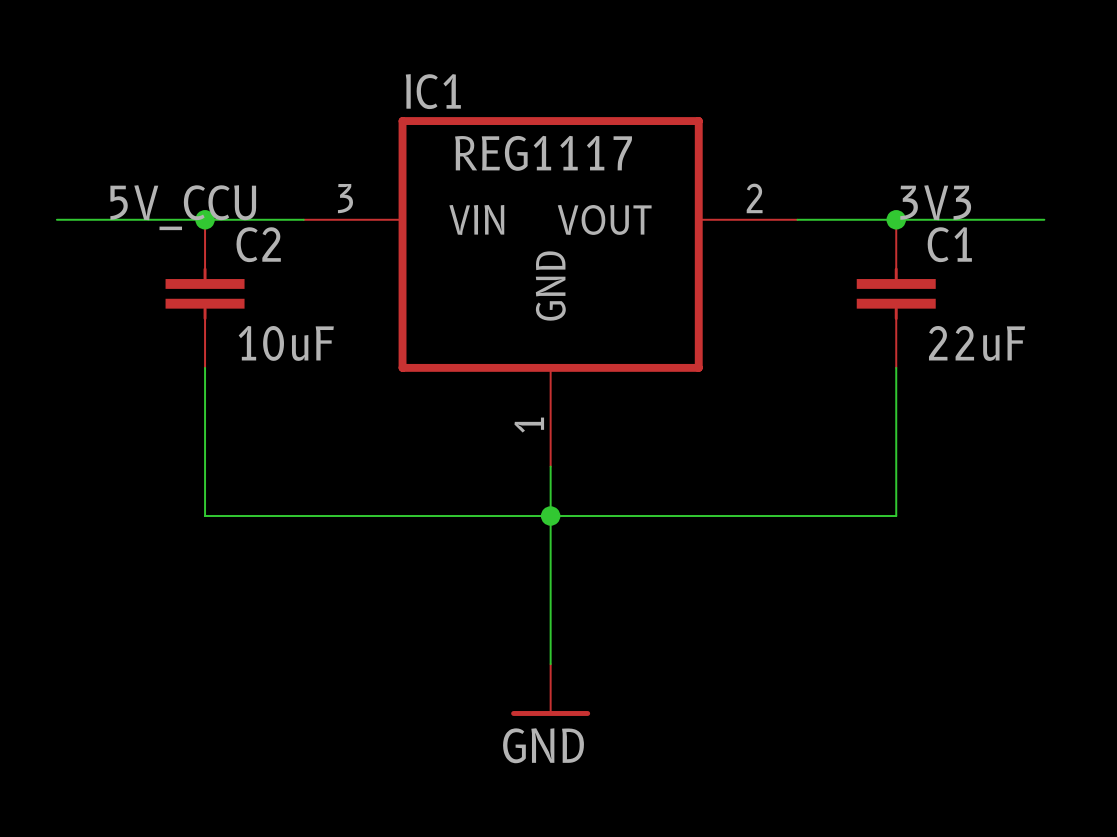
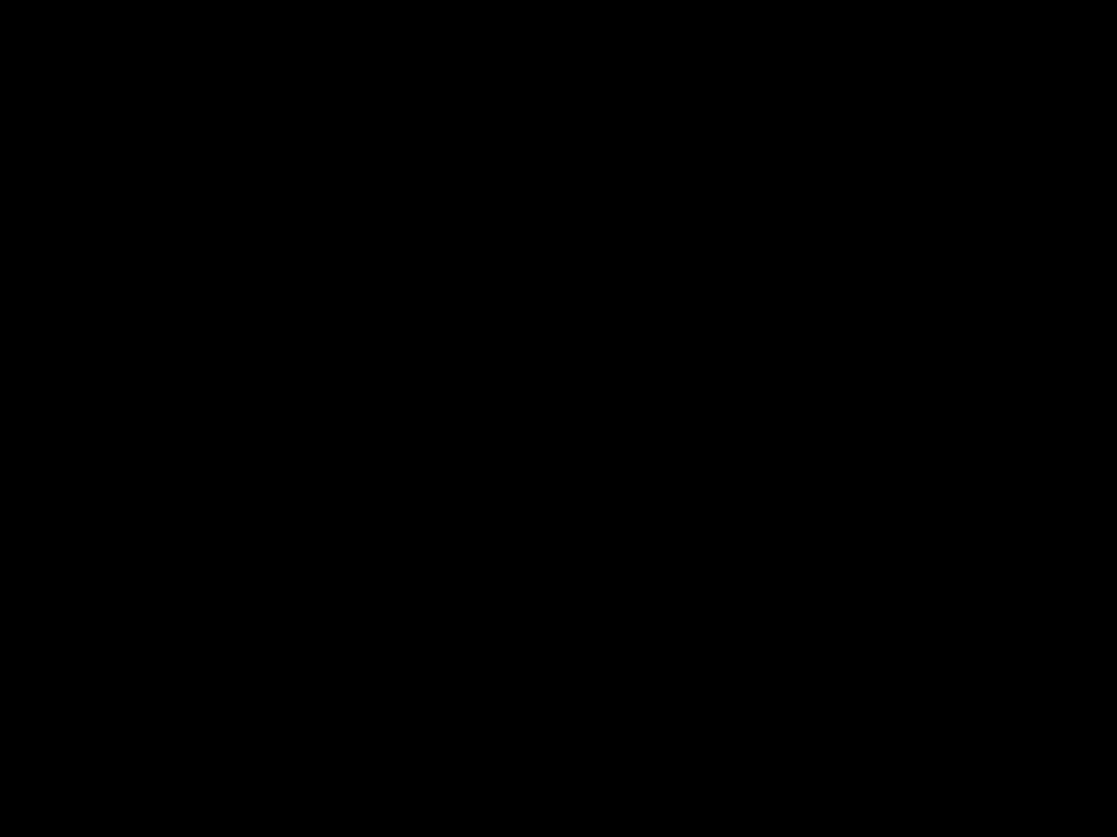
label: 3V3 (935, 202) -> none
label: 5V_CCU (183, 207) -> none
wire: (56, 219) (303, 219) -> none
junction: (205, 219) -> none
wire: (797, 219) (1044, 219) -> none
junction: (896, 219) -> none
IC1: REG1117 (550, 291) -> none
C2: 10uF (205, 293) -> none
C1: 22uF (896, 293) -> none
wire: (205, 367) (205, 516) (896, 516) (896, 367) -> none
wire: (550, 466) (550, 664) -> none
junction: (550, 516) -> none
power symbol: GND (550, 690) -> none

